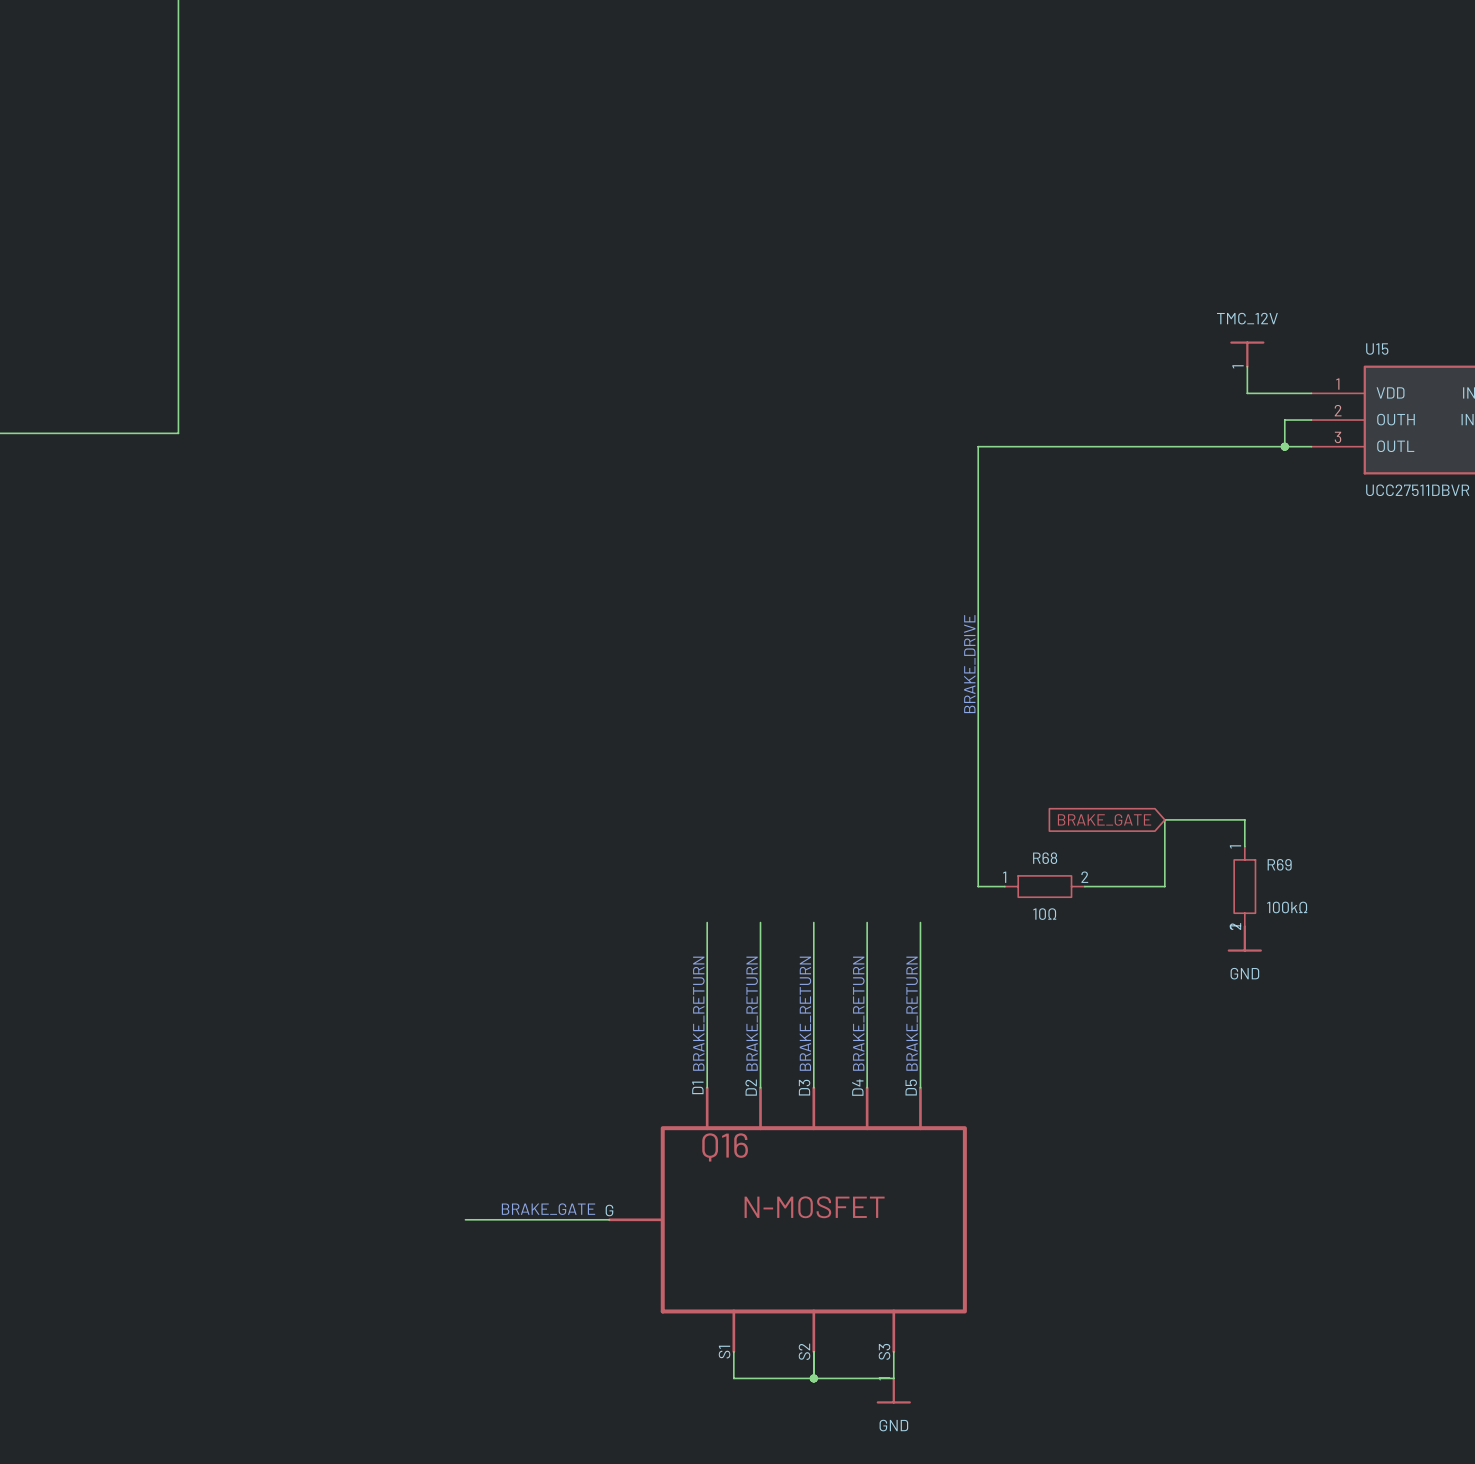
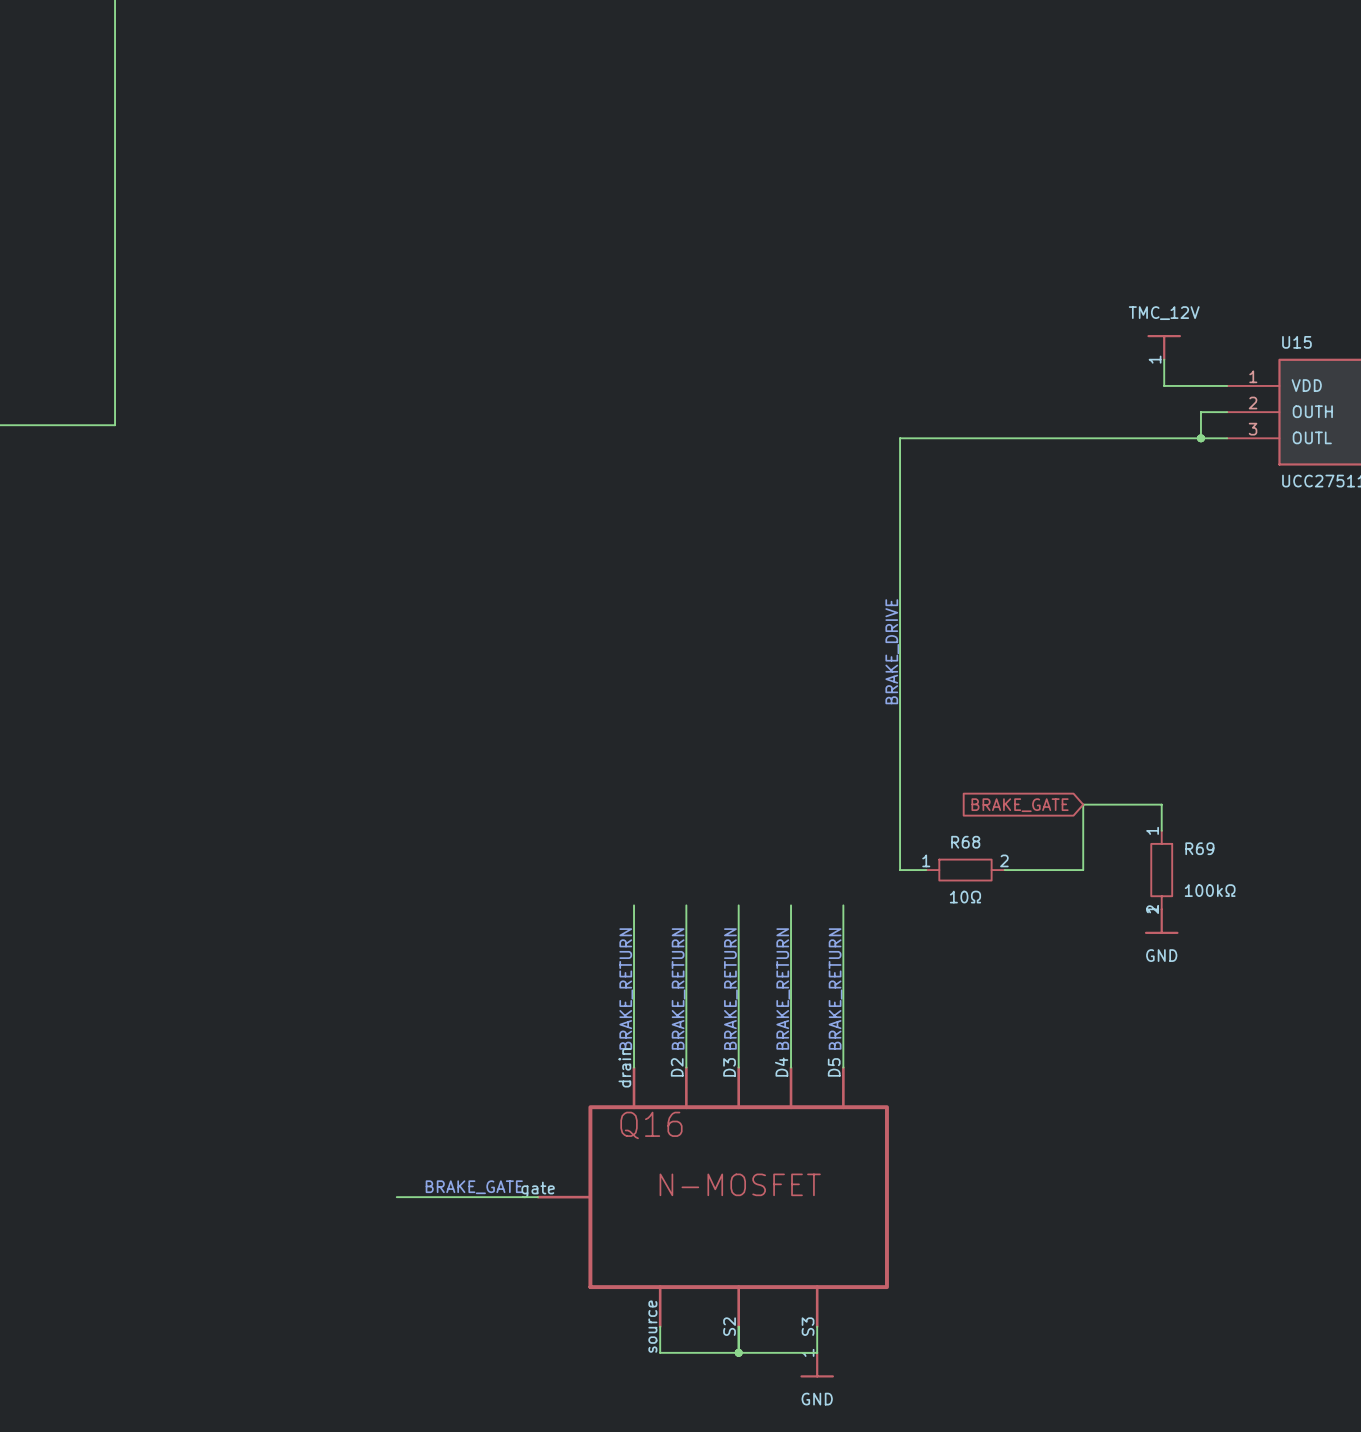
part pin name: D1 (697, 1087) -> drain (624, 1067)
part pin name: G (609, 1210) -> gate (538, 1189)
part pin name: S1 (724, 1352) -> source (652, 1326)

